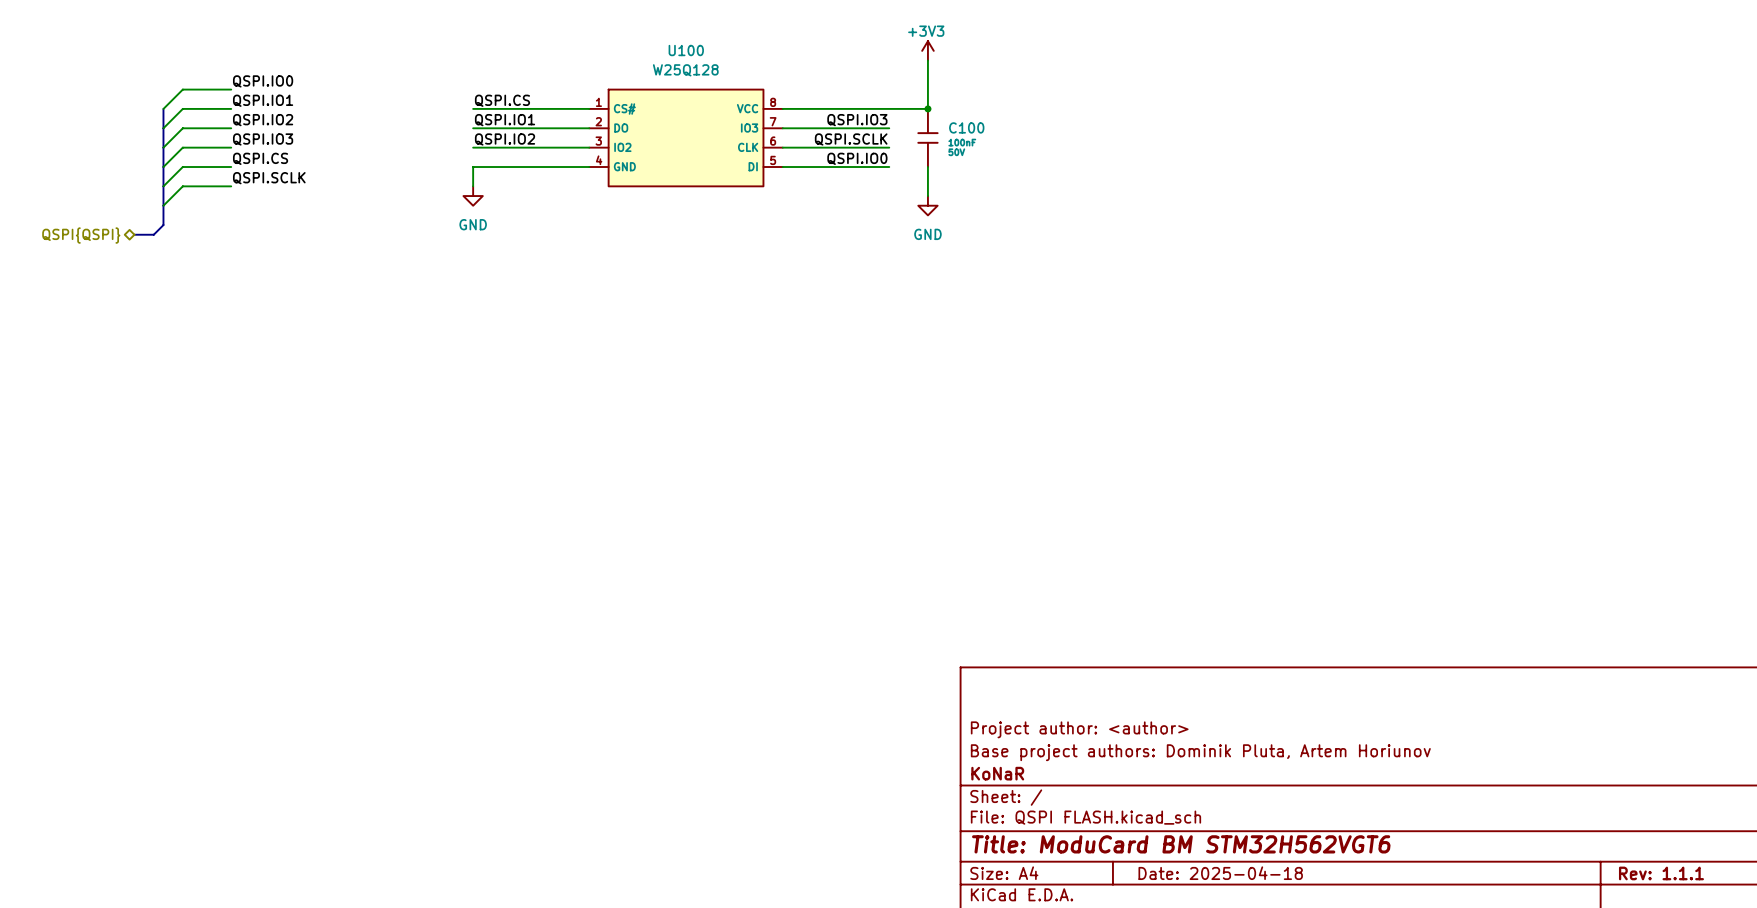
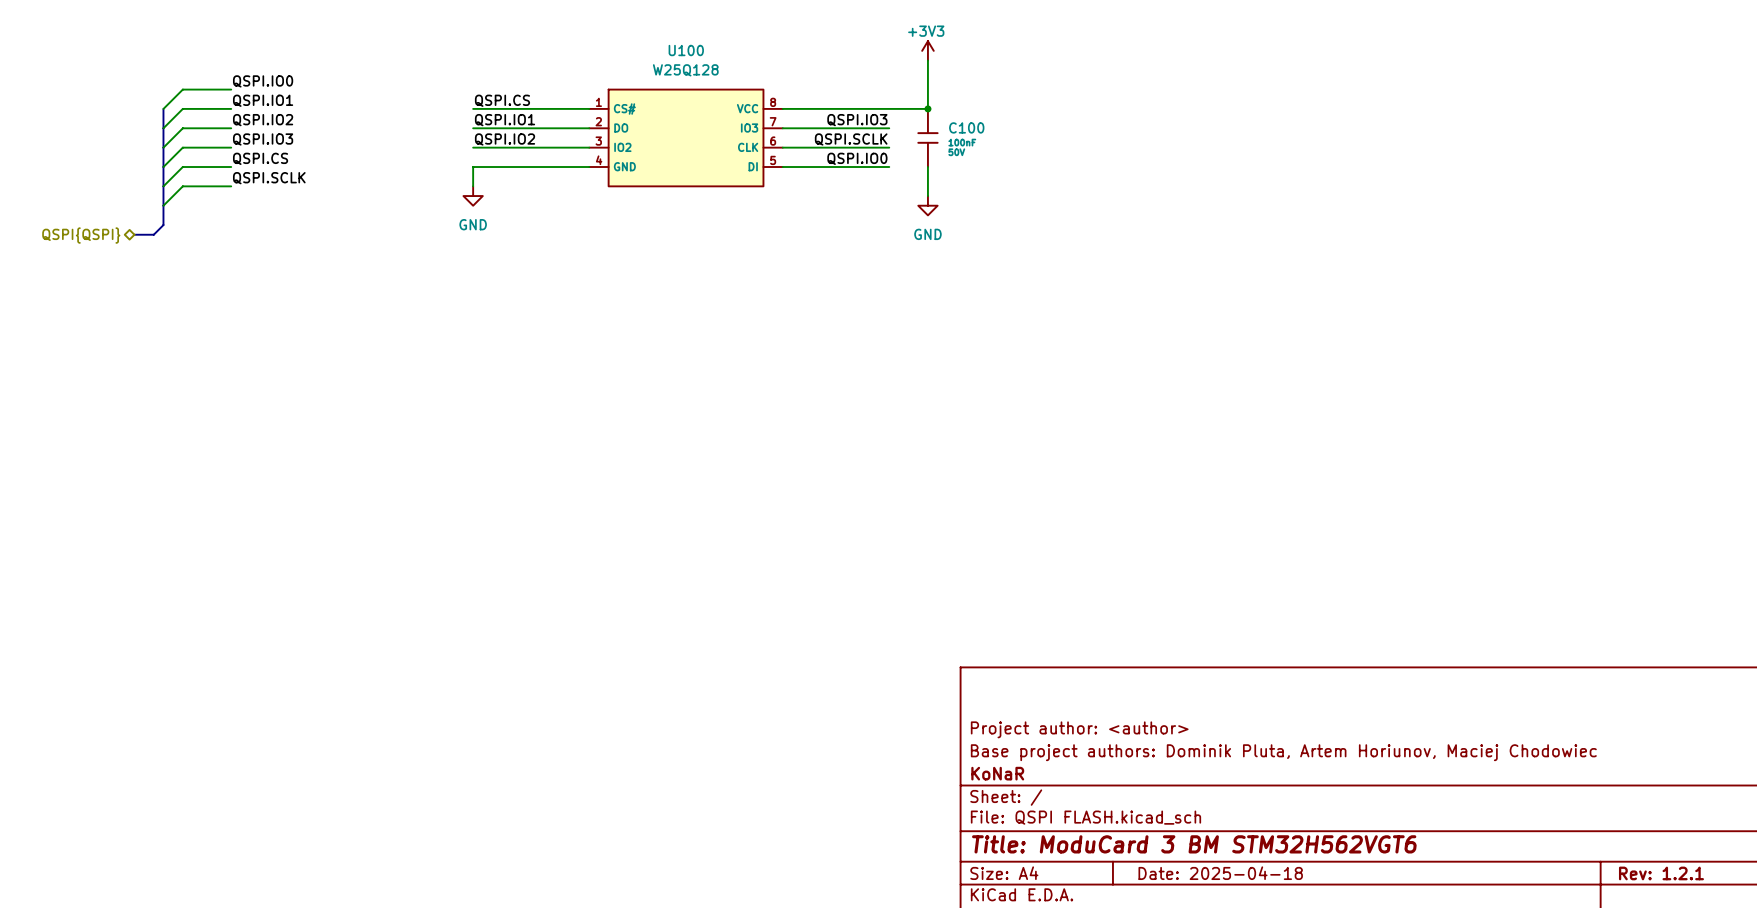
title block: Base project authors: Dominik Pluta, Artem Horiunov (1200, 752) -> Base project authors: Dominik Pluta, Artem Horiunov, Maciej Chodowiec (1283, 752)
title block: Title: ModuCard BM STM32H562VGT6 (1181, 844) -> Title: ModuCard 3 BM STM32H562VGT6 (1194, 844)
title block: Rev: 1.1.1 (1661, 873) -> Rev: 1.2.1 (1661, 873)

